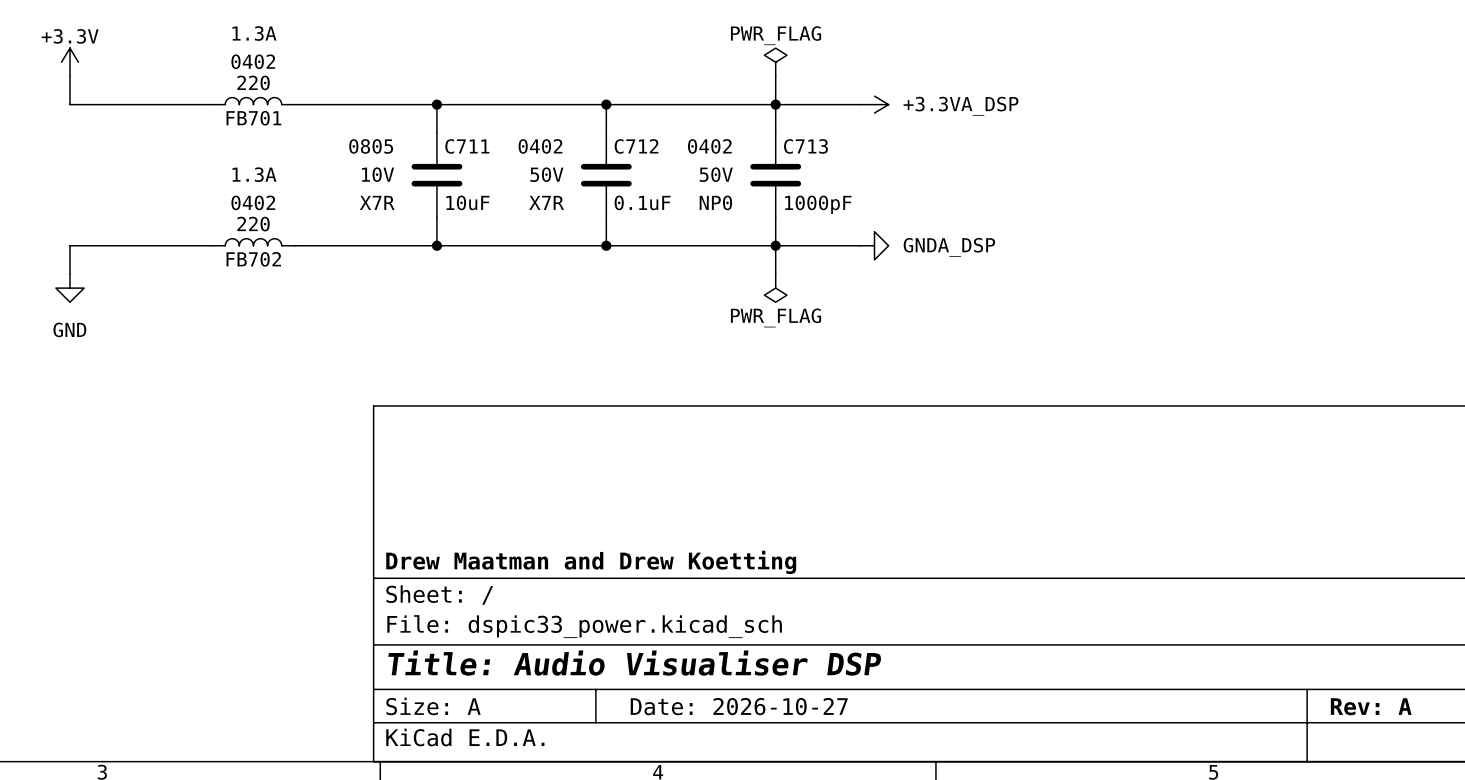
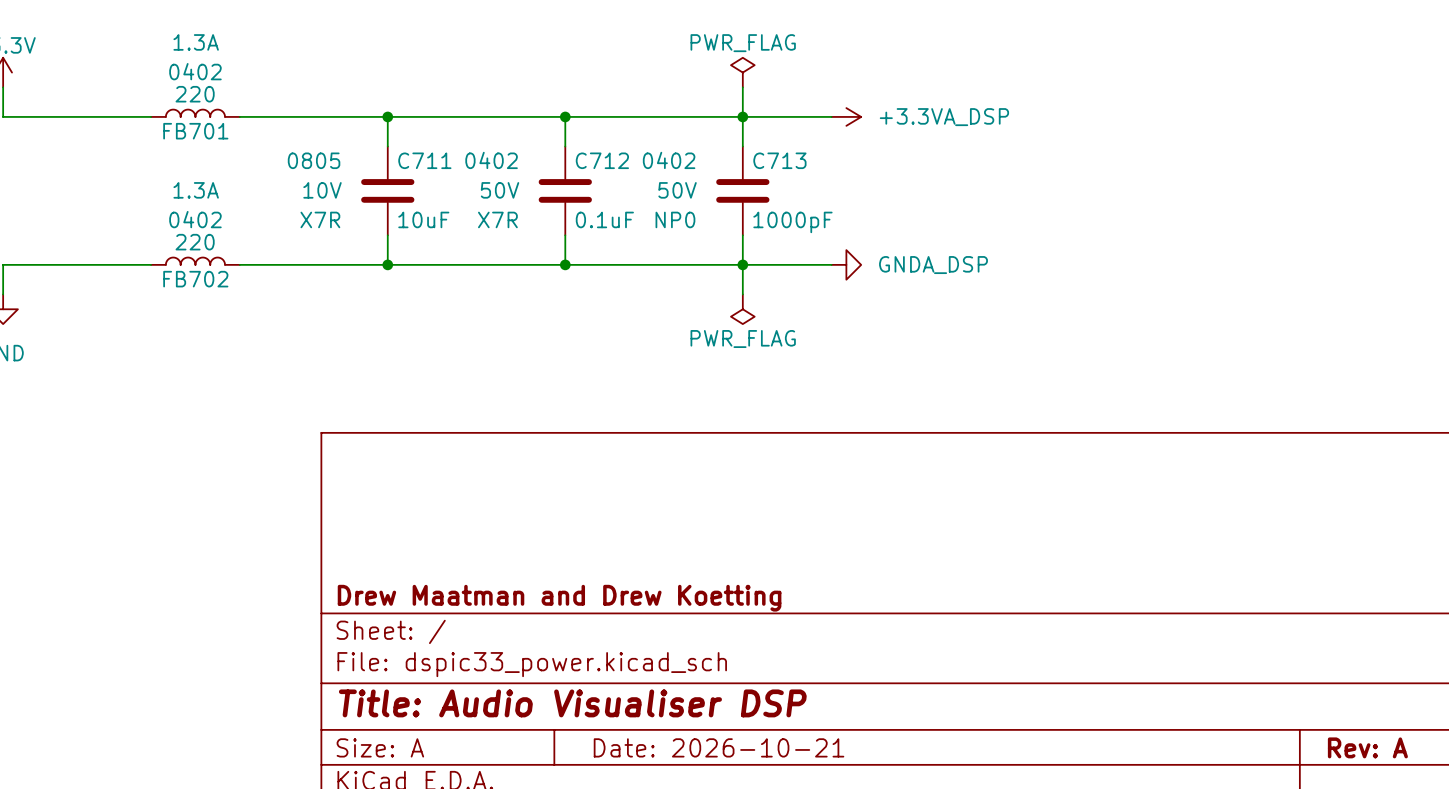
title block: Date: 2026-10-27 (739, 706) -> Date: 2026-10-21 (719, 747)

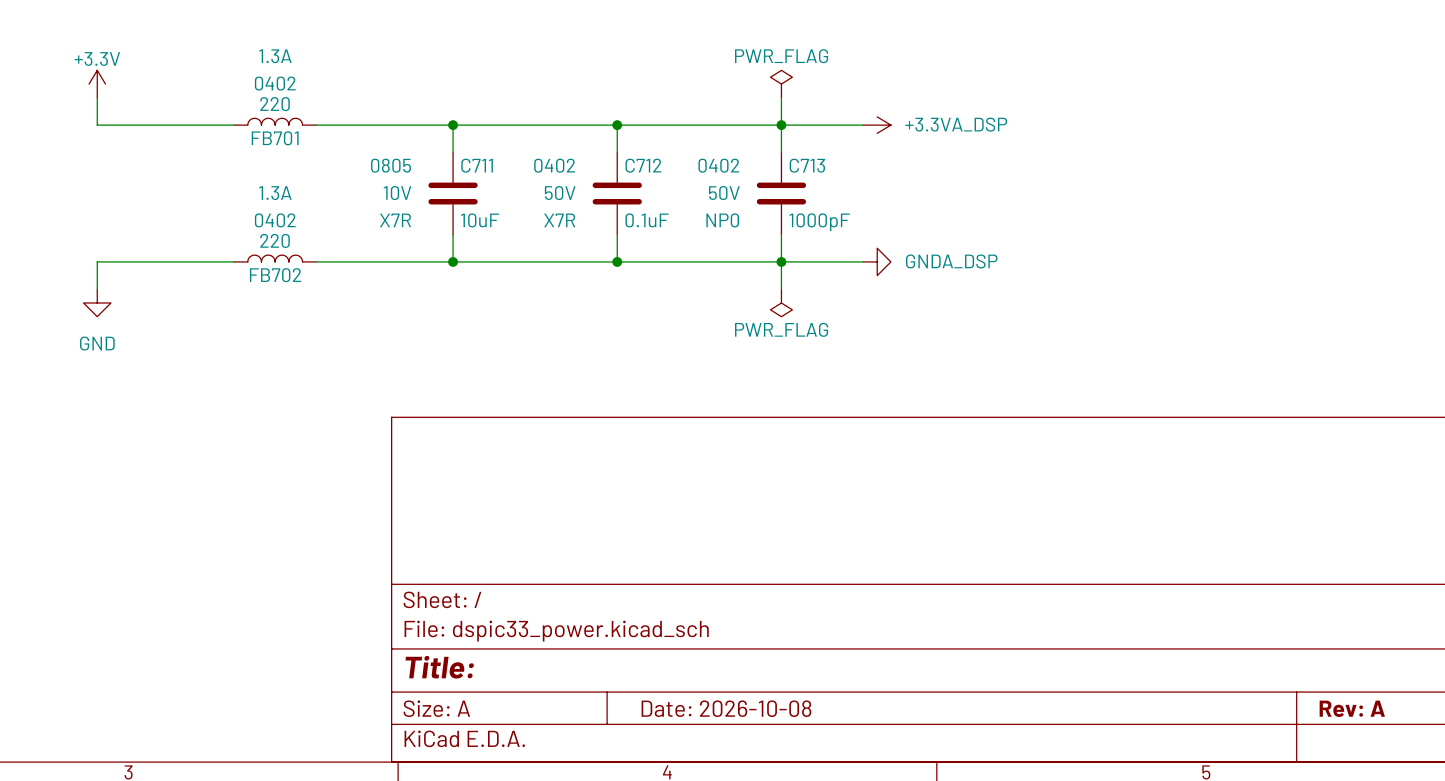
title block: Drew Maatman and Drew Koetting (559, 598) -> none
title block: Title: Audio Visualiser DSP (572, 703) -> Title: (439, 667)
title block: Date: 2026-10-21 (719, 747) -> Date: 2026-10-08 (726, 708)

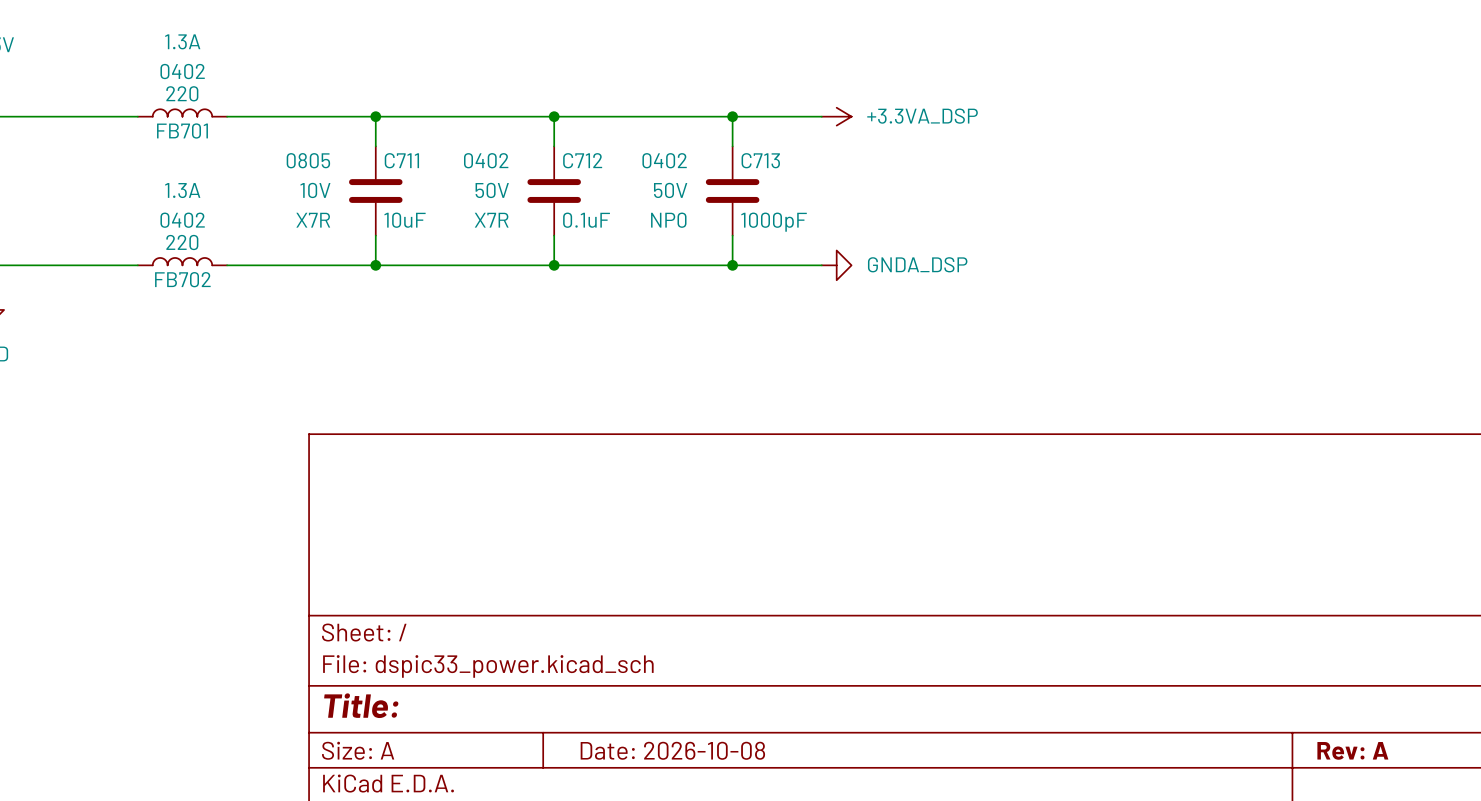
power symbol: PWR_FLAG (781, 84) -> none
wire: (781, 97) (781, 125) -> none
wire: (781, 261) (781, 289) -> none
power symbol: PWR_FLAG (781, 303) -> none

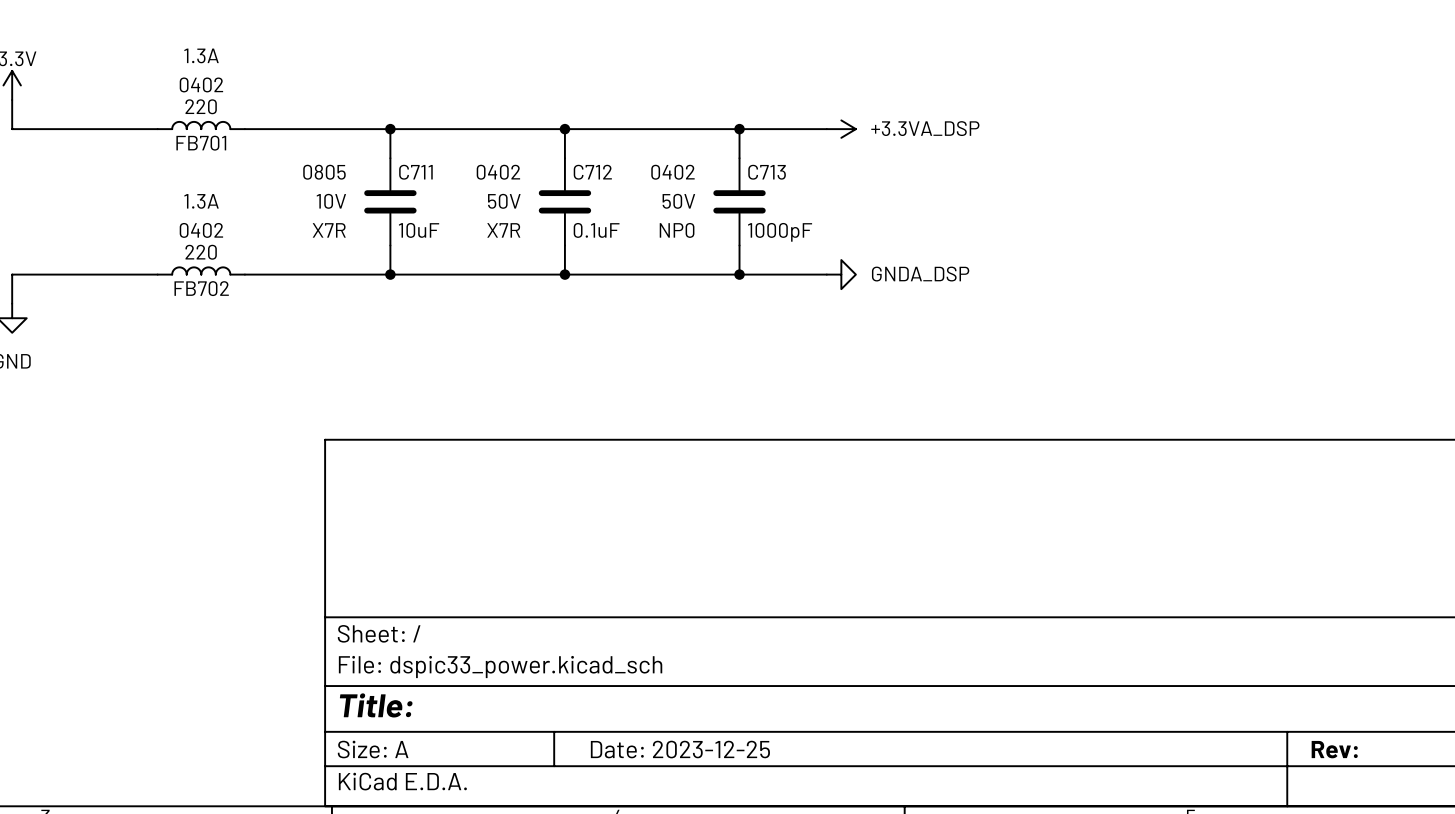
title block: Date: 2026-10-08 (672, 750) -> Date: 2023-12-25 (680, 749)
title block: Rev: A (1352, 750) -> Rev: (1334, 749)

